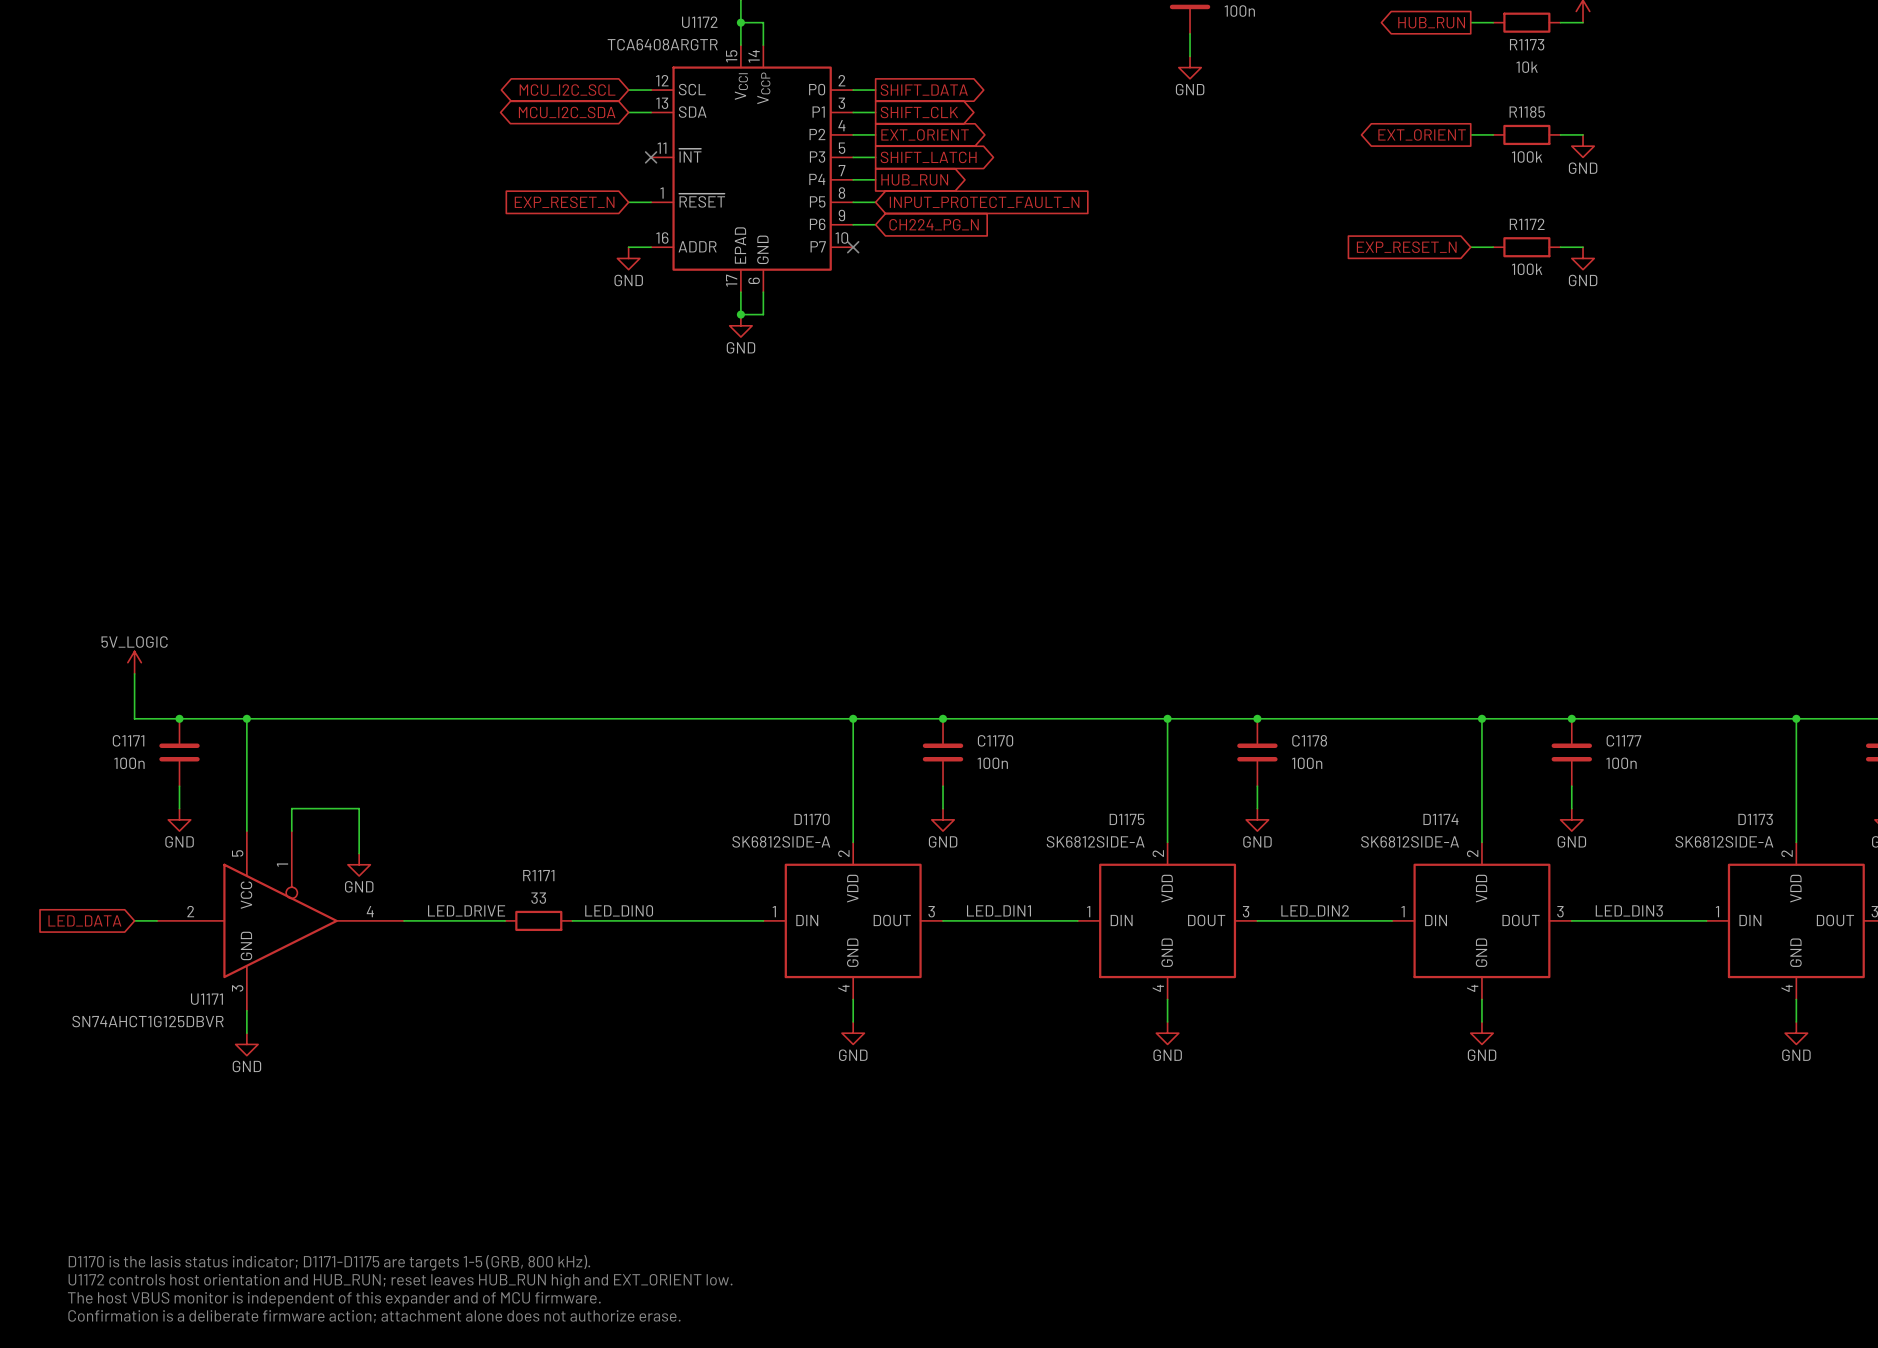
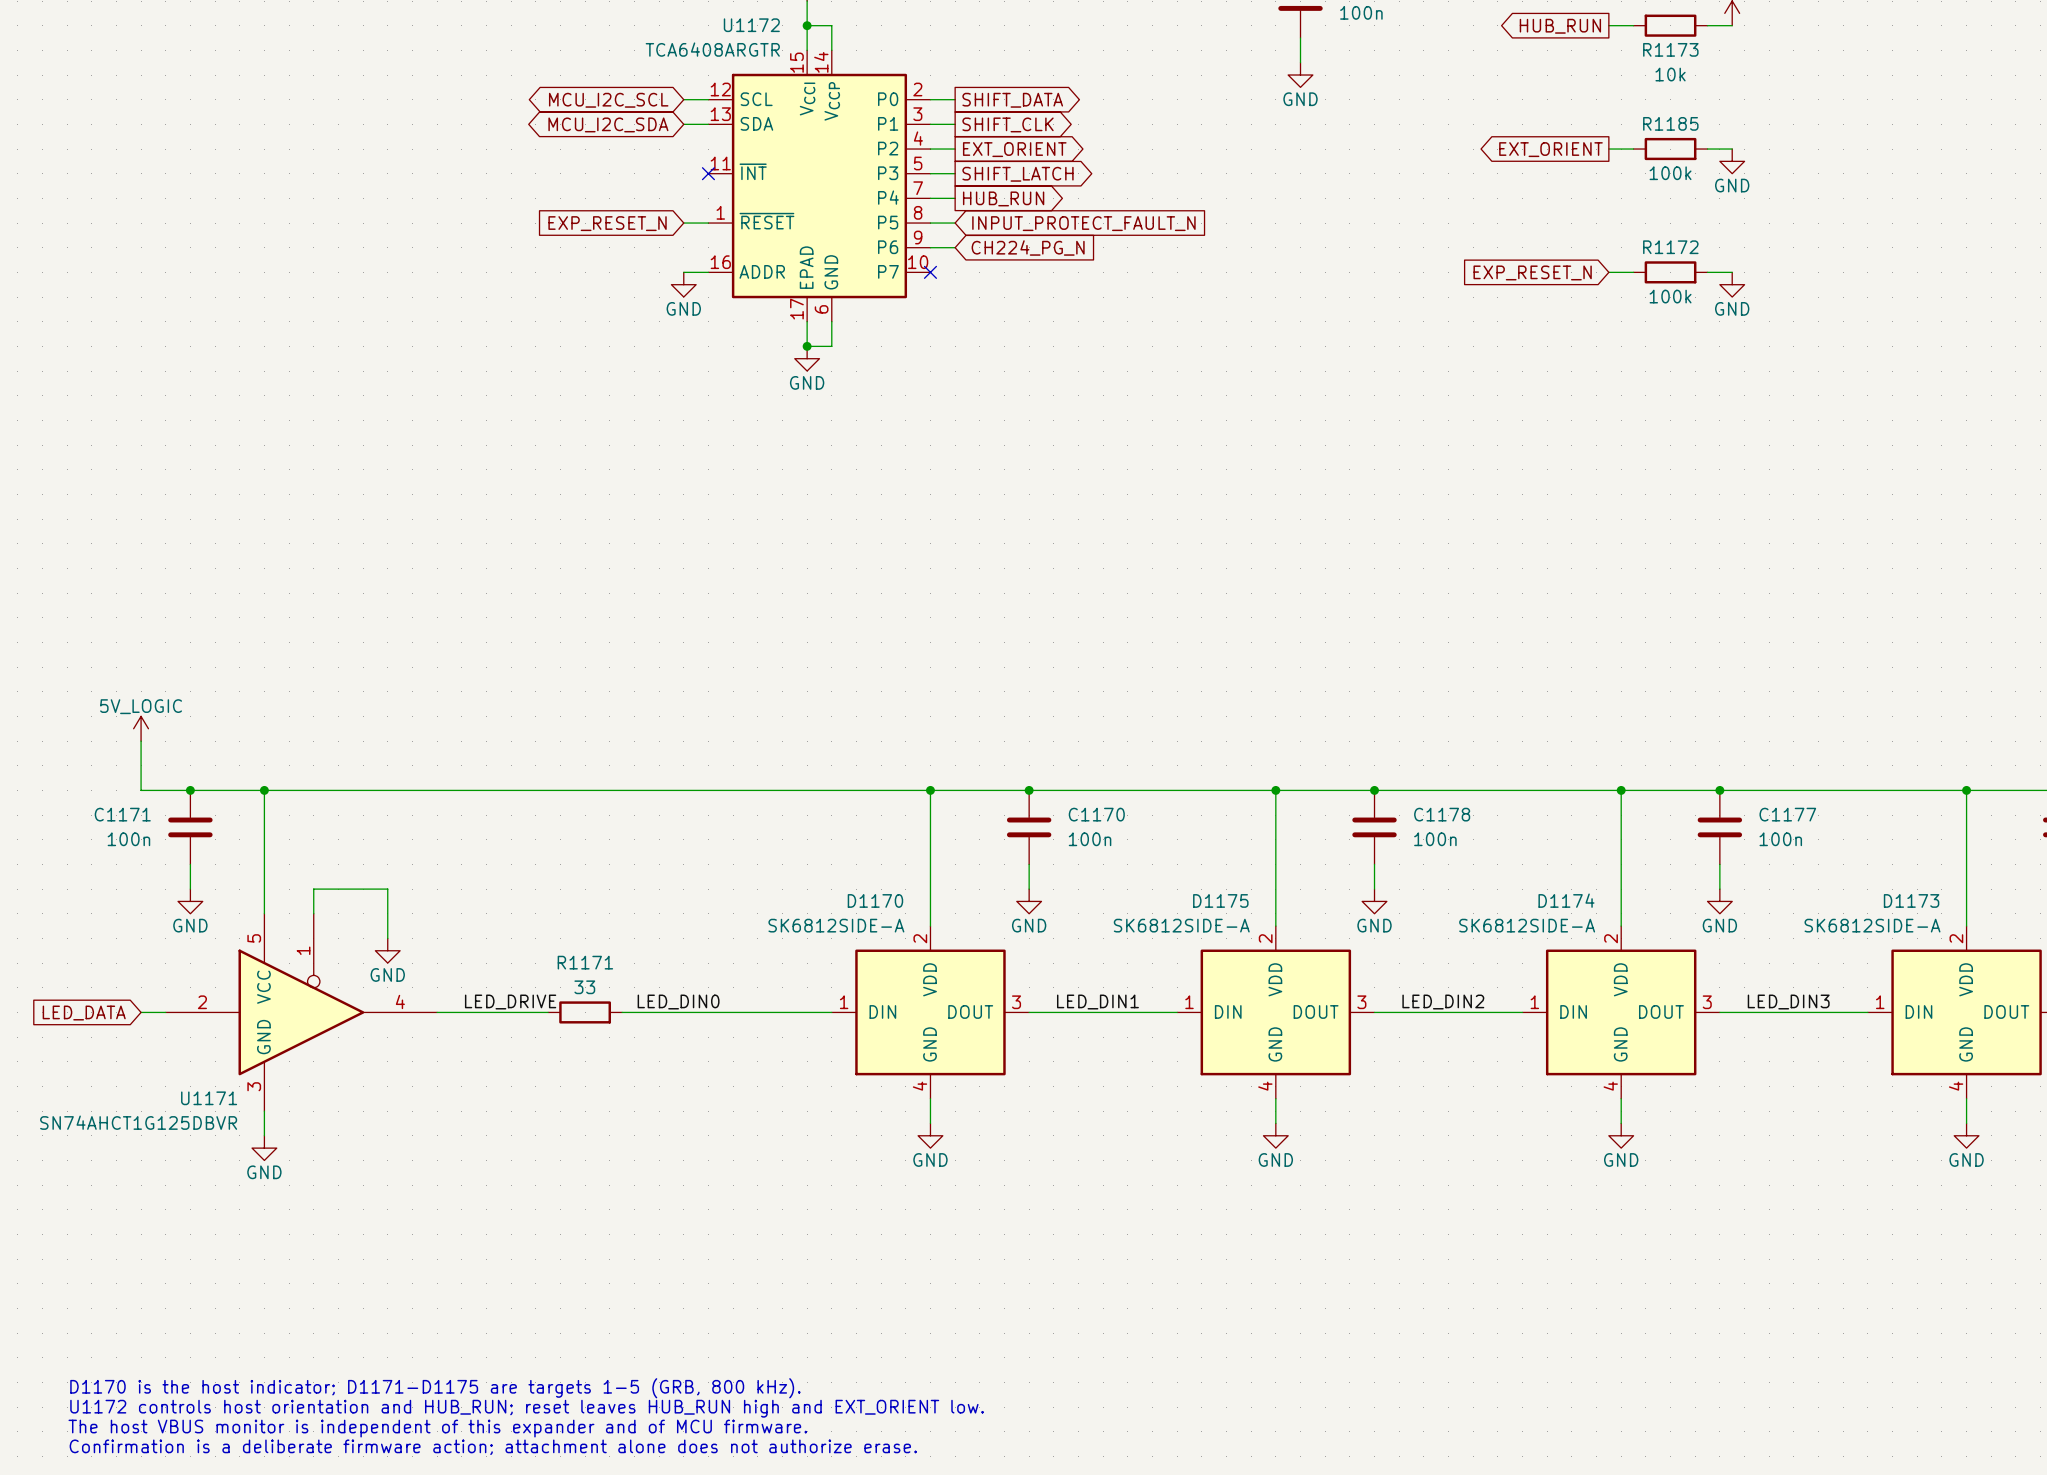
text: D1170 is the Iasis status indicator; D1171-D1175 are targets 1-5 (GRB, 800 kHz). (329, 1262) -> D1170 is the host indicator; D1171-D1175 are targets 1-5 (GRB, 800 kHz). (435, 1388)

